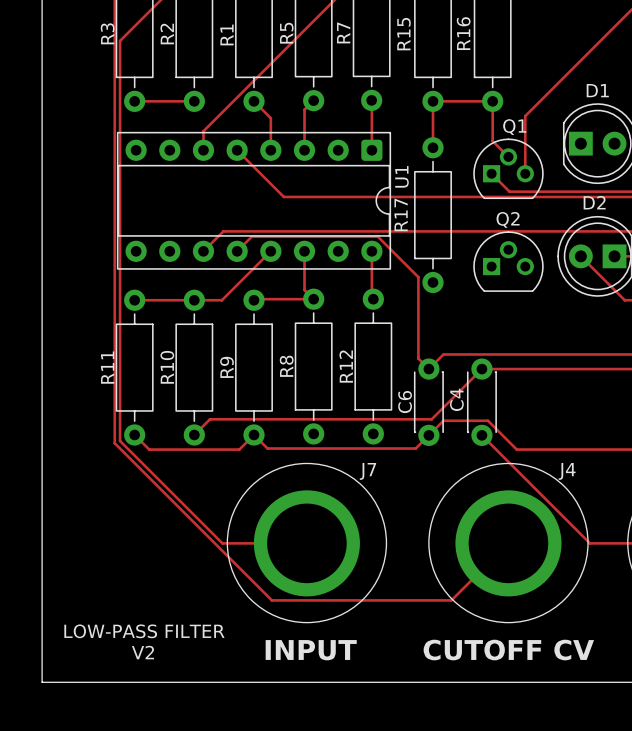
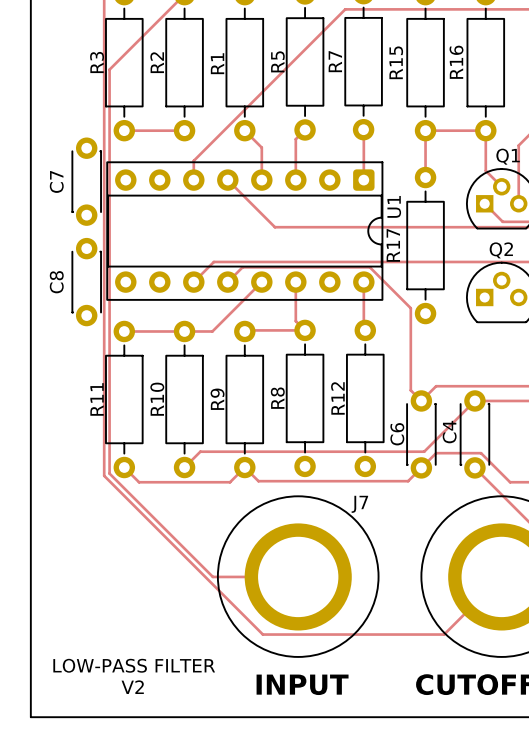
C7: none -> (86, 181)
C8: none -> (86, 282)

